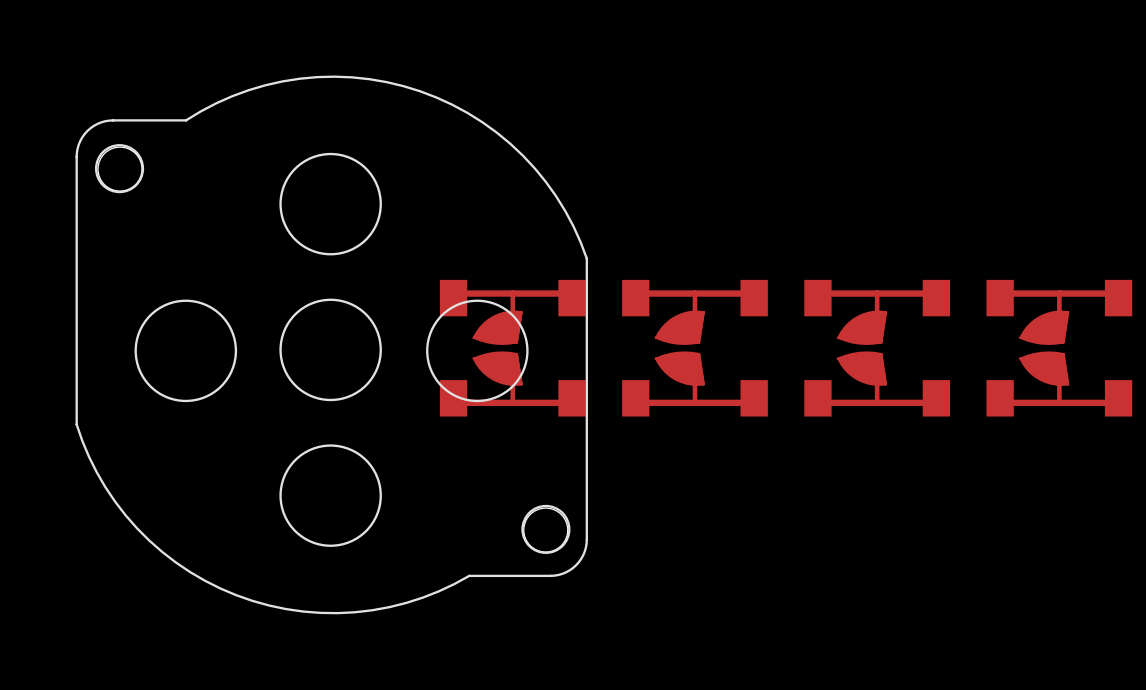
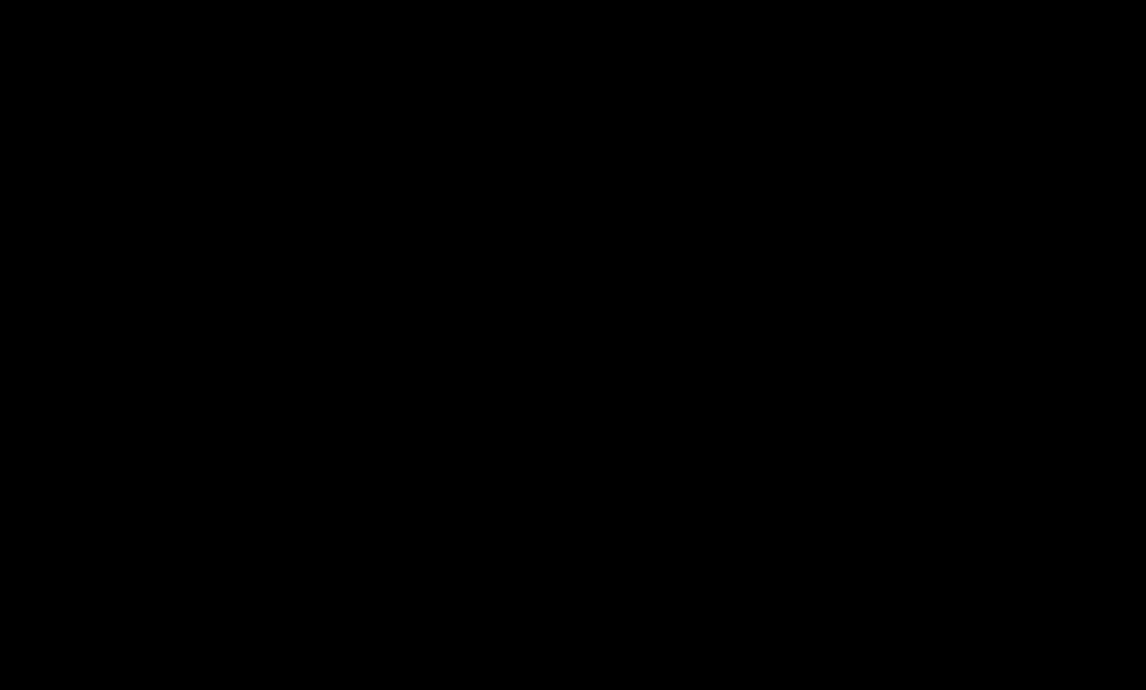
part: (331, 344) -> none
part: (512, 348) -> none
part: (694, 348) -> none
part: (877, 348) -> none
part: (1059, 348) -> none

